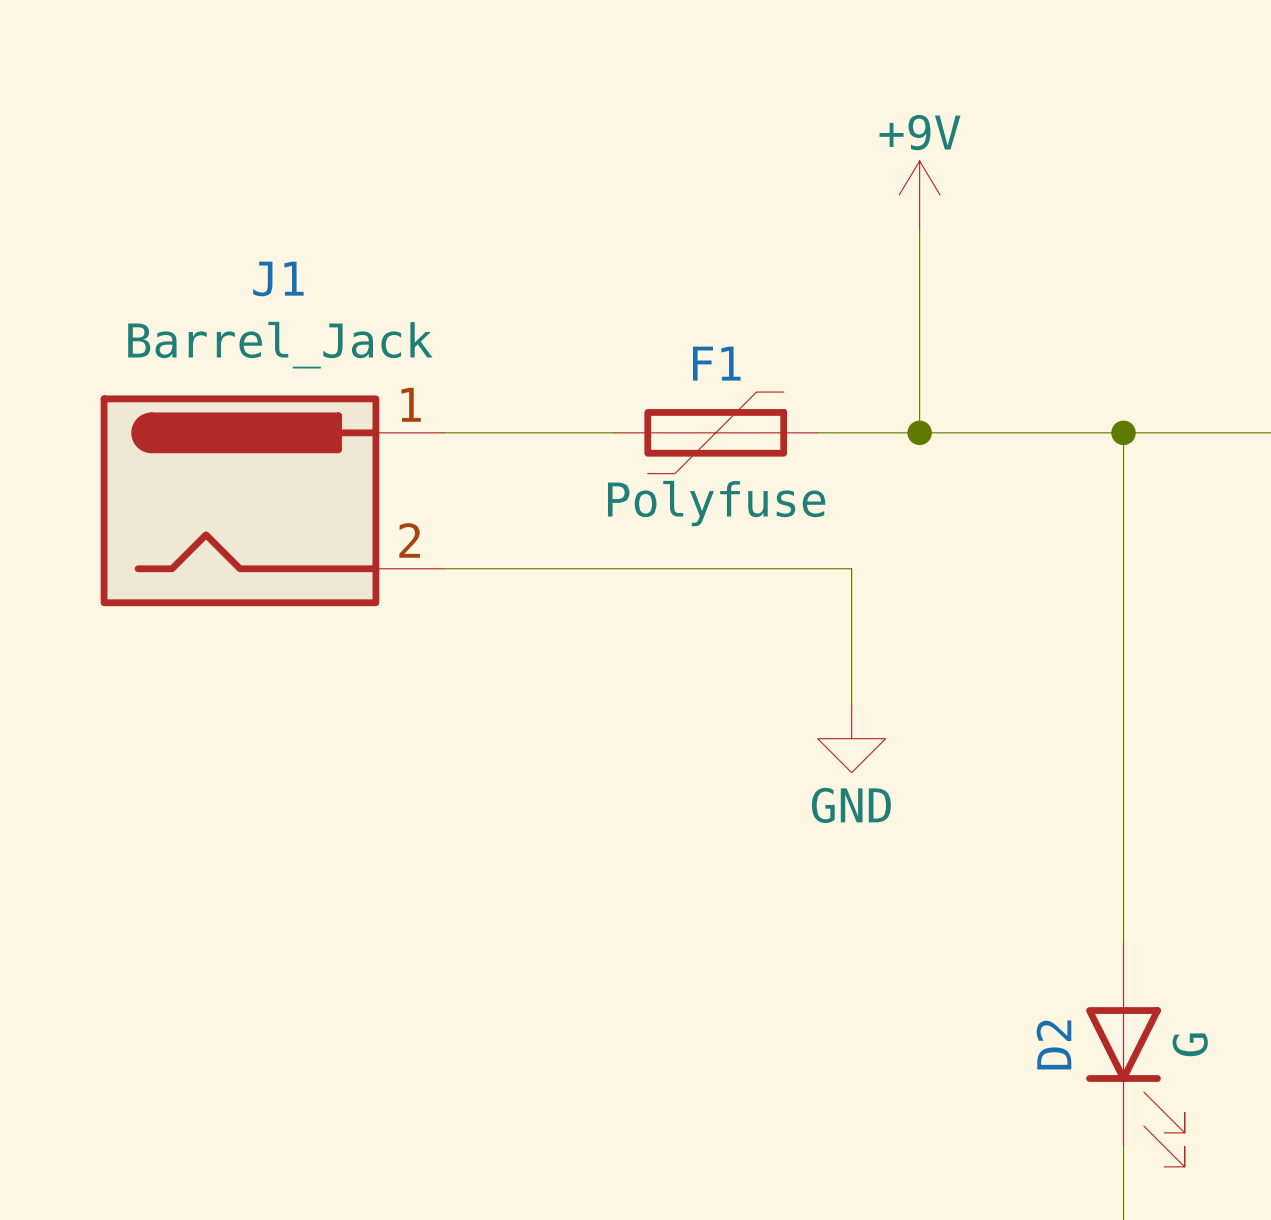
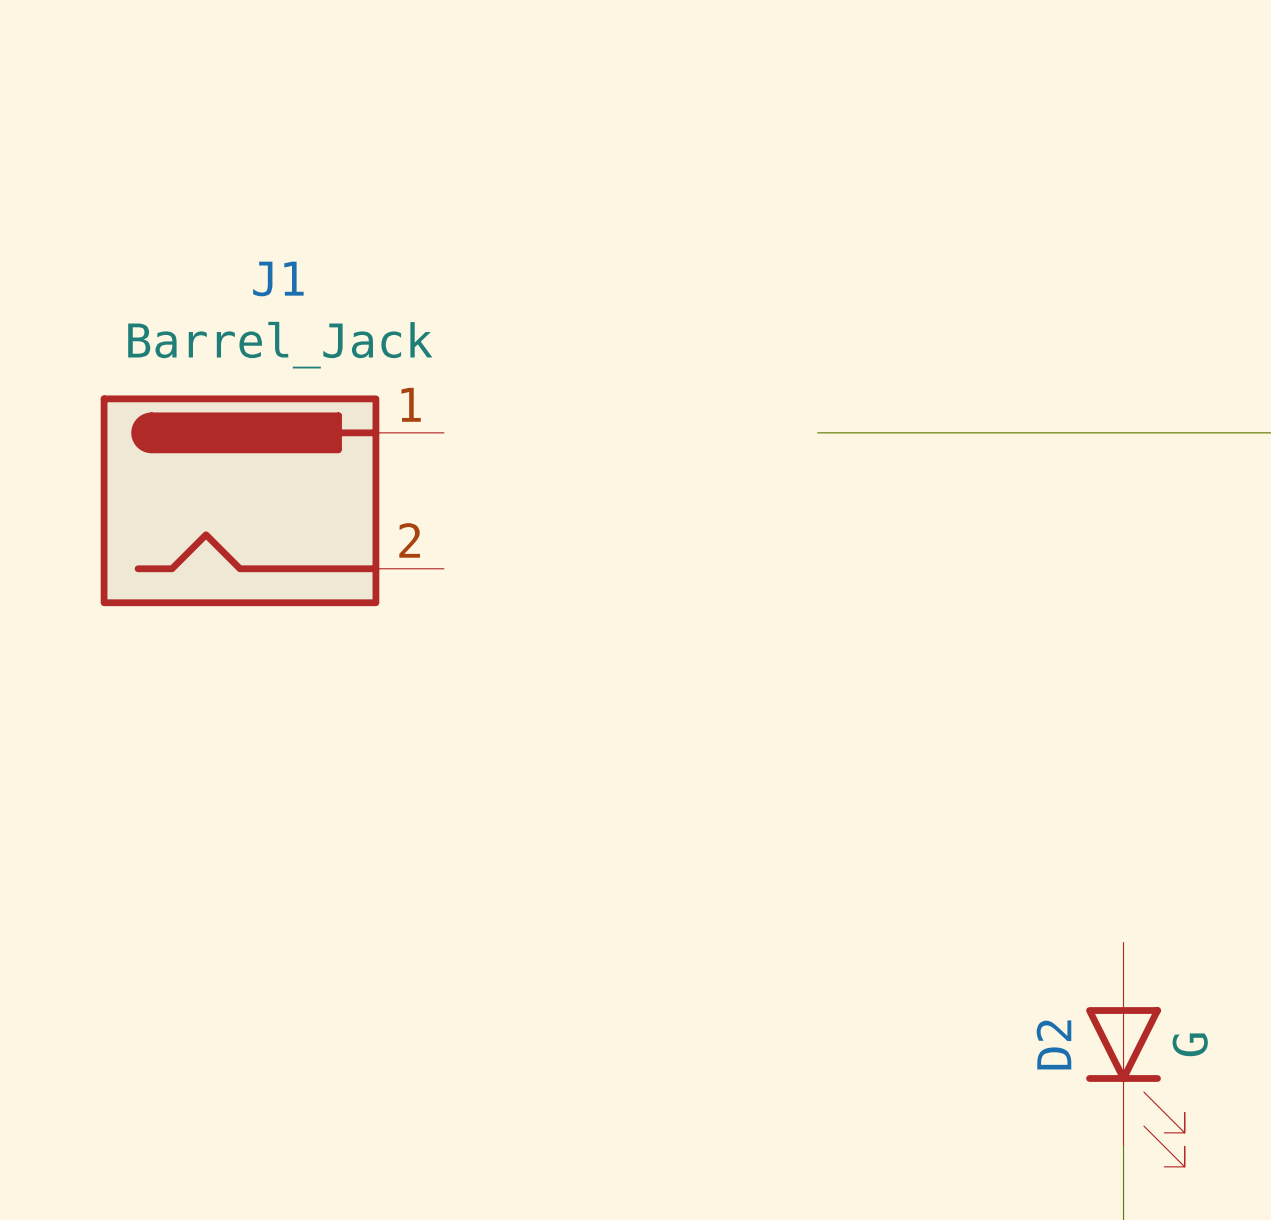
power symbol: +9V (919, 194) -> none
wire: (919, 228) (919, 432) -> none
wire: (443, 432) (613, 432) -> none
F1: Polyfuse (715, 432) -> none
junction: (919, 432) -> none
wire: (1123, 432) (1123, 942) -> none
junction: (1123, 432) -> none
wire: (443, 568) (851, 568) (851, 704) -> none
power symbol: GND (851, 738) -> none

